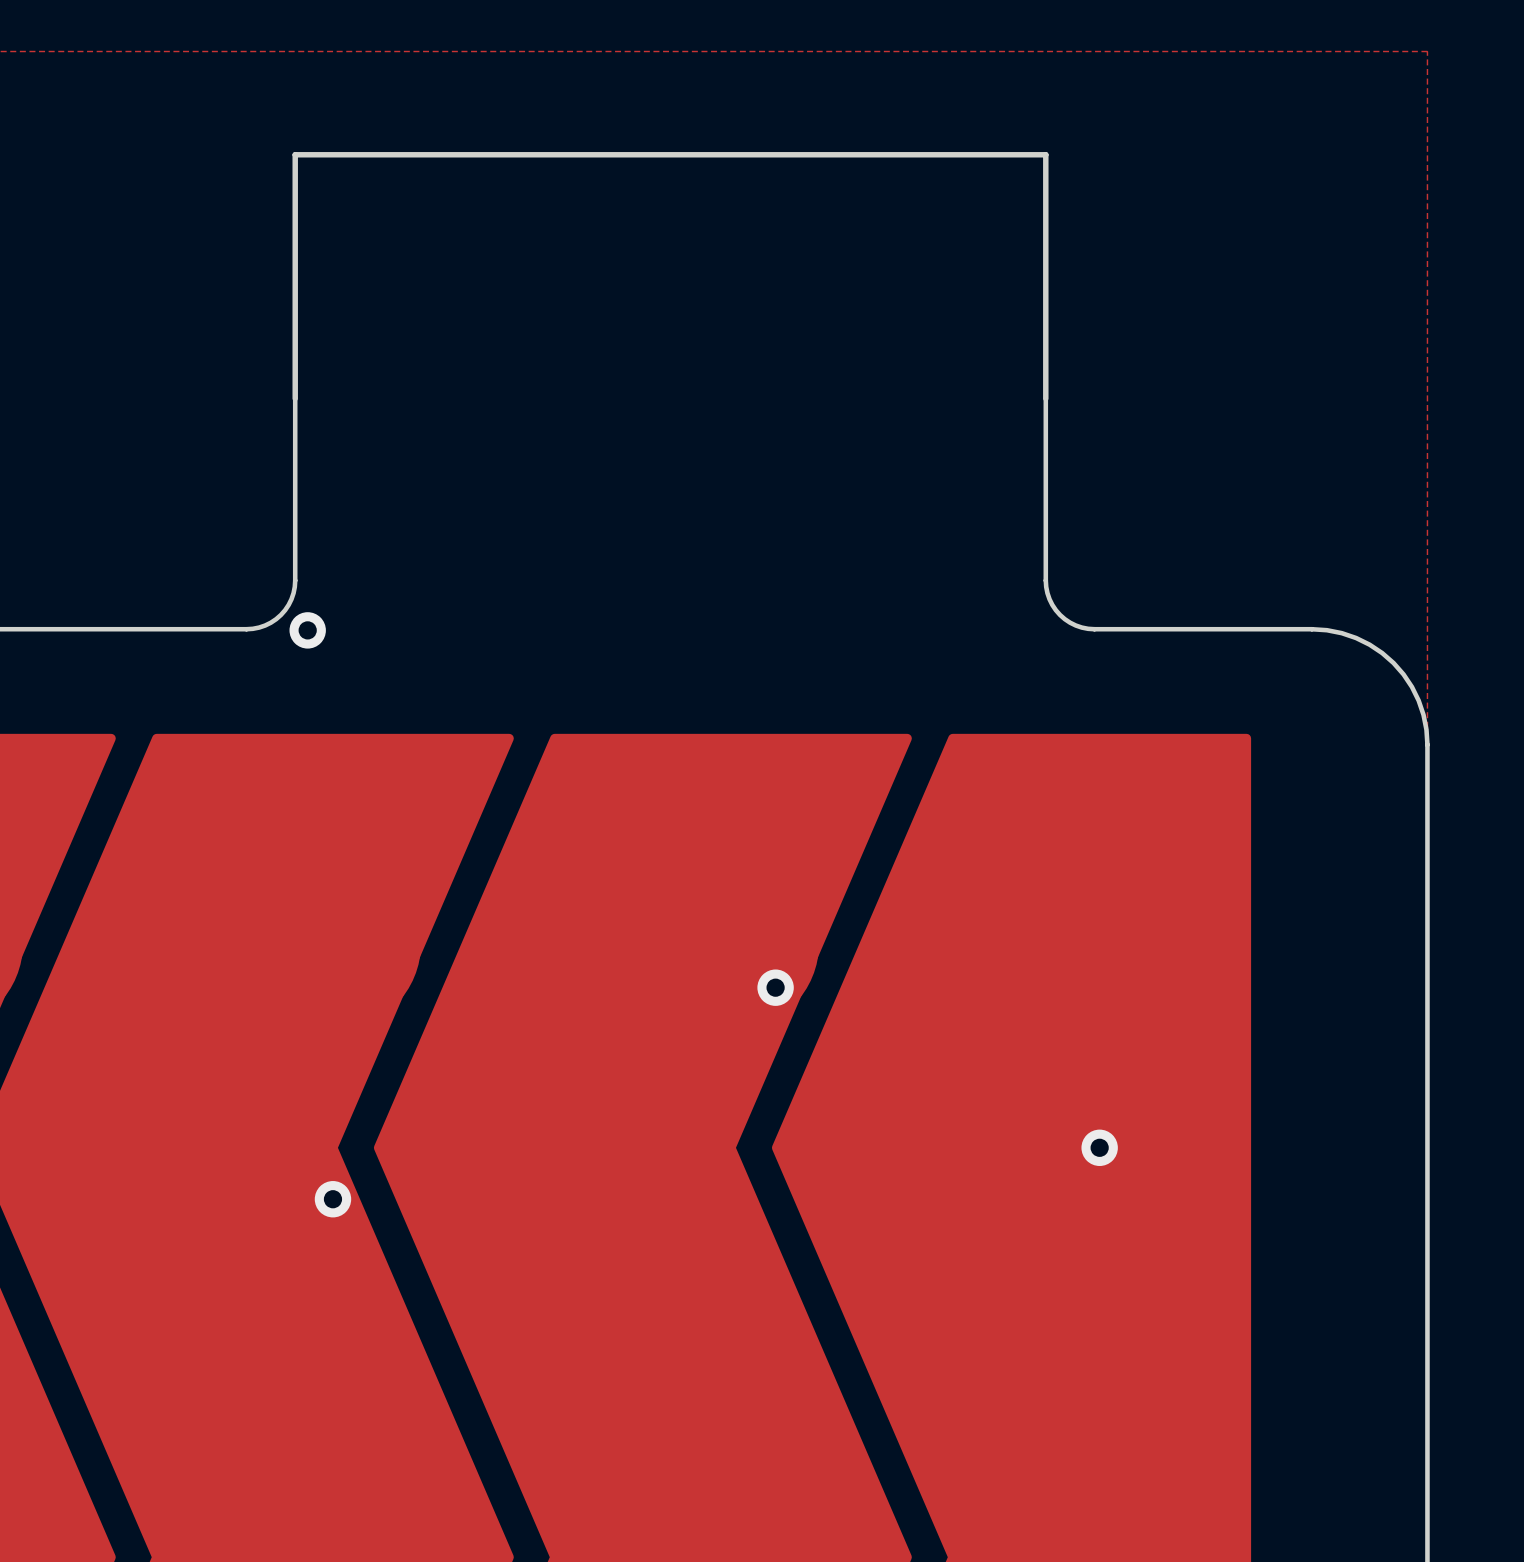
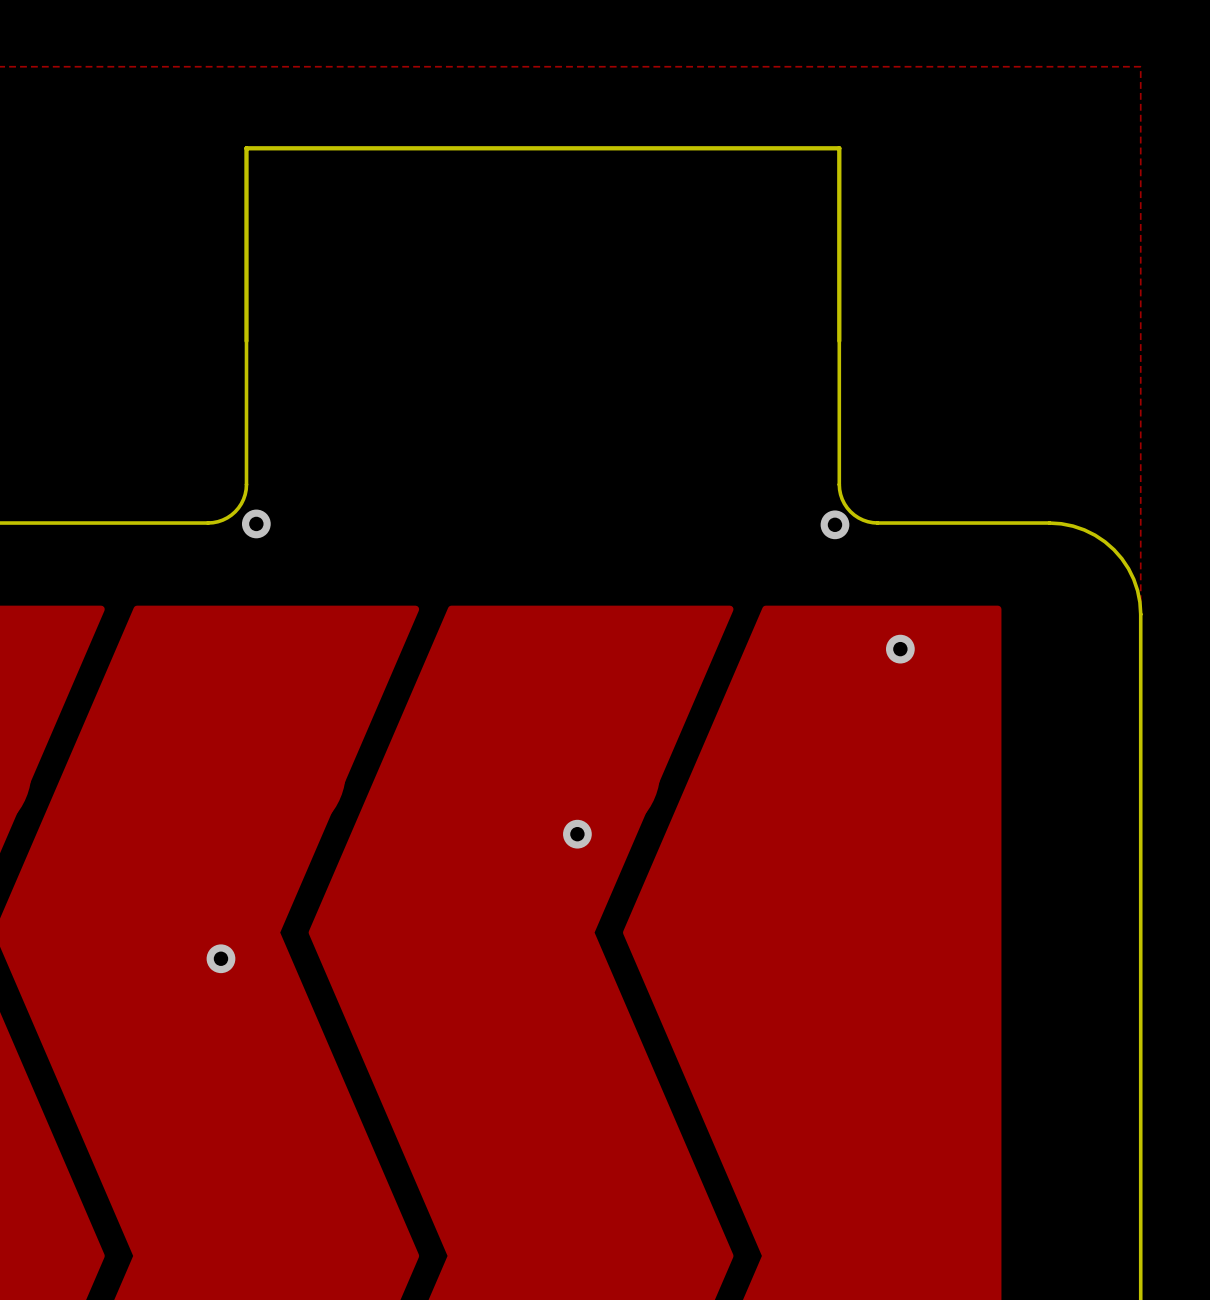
via: none -> (834, 524)
via: none -> (900, 649)
via position: (775, 987) -> (577, 834)
via: (1099, 1147) -> none
via position: (332, 1199) -> (220, 958)

